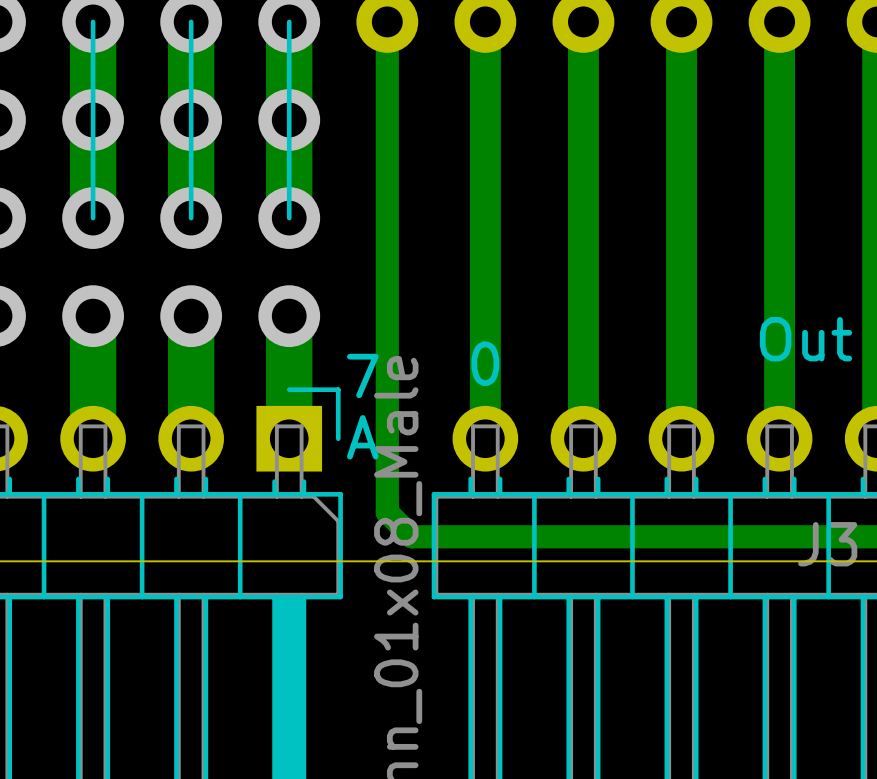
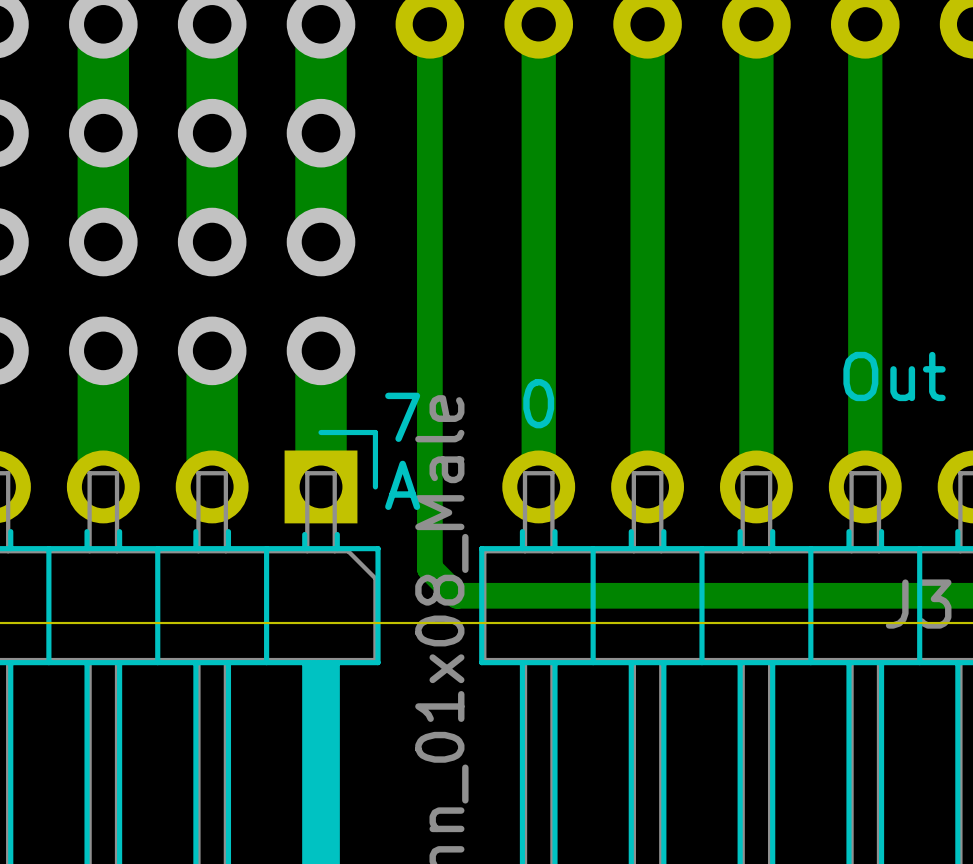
line: (93, 21) (93, 218) -> none
line: (191, 21) (191, 218) -> none
line: (289, 21) (289, 218) -> none

